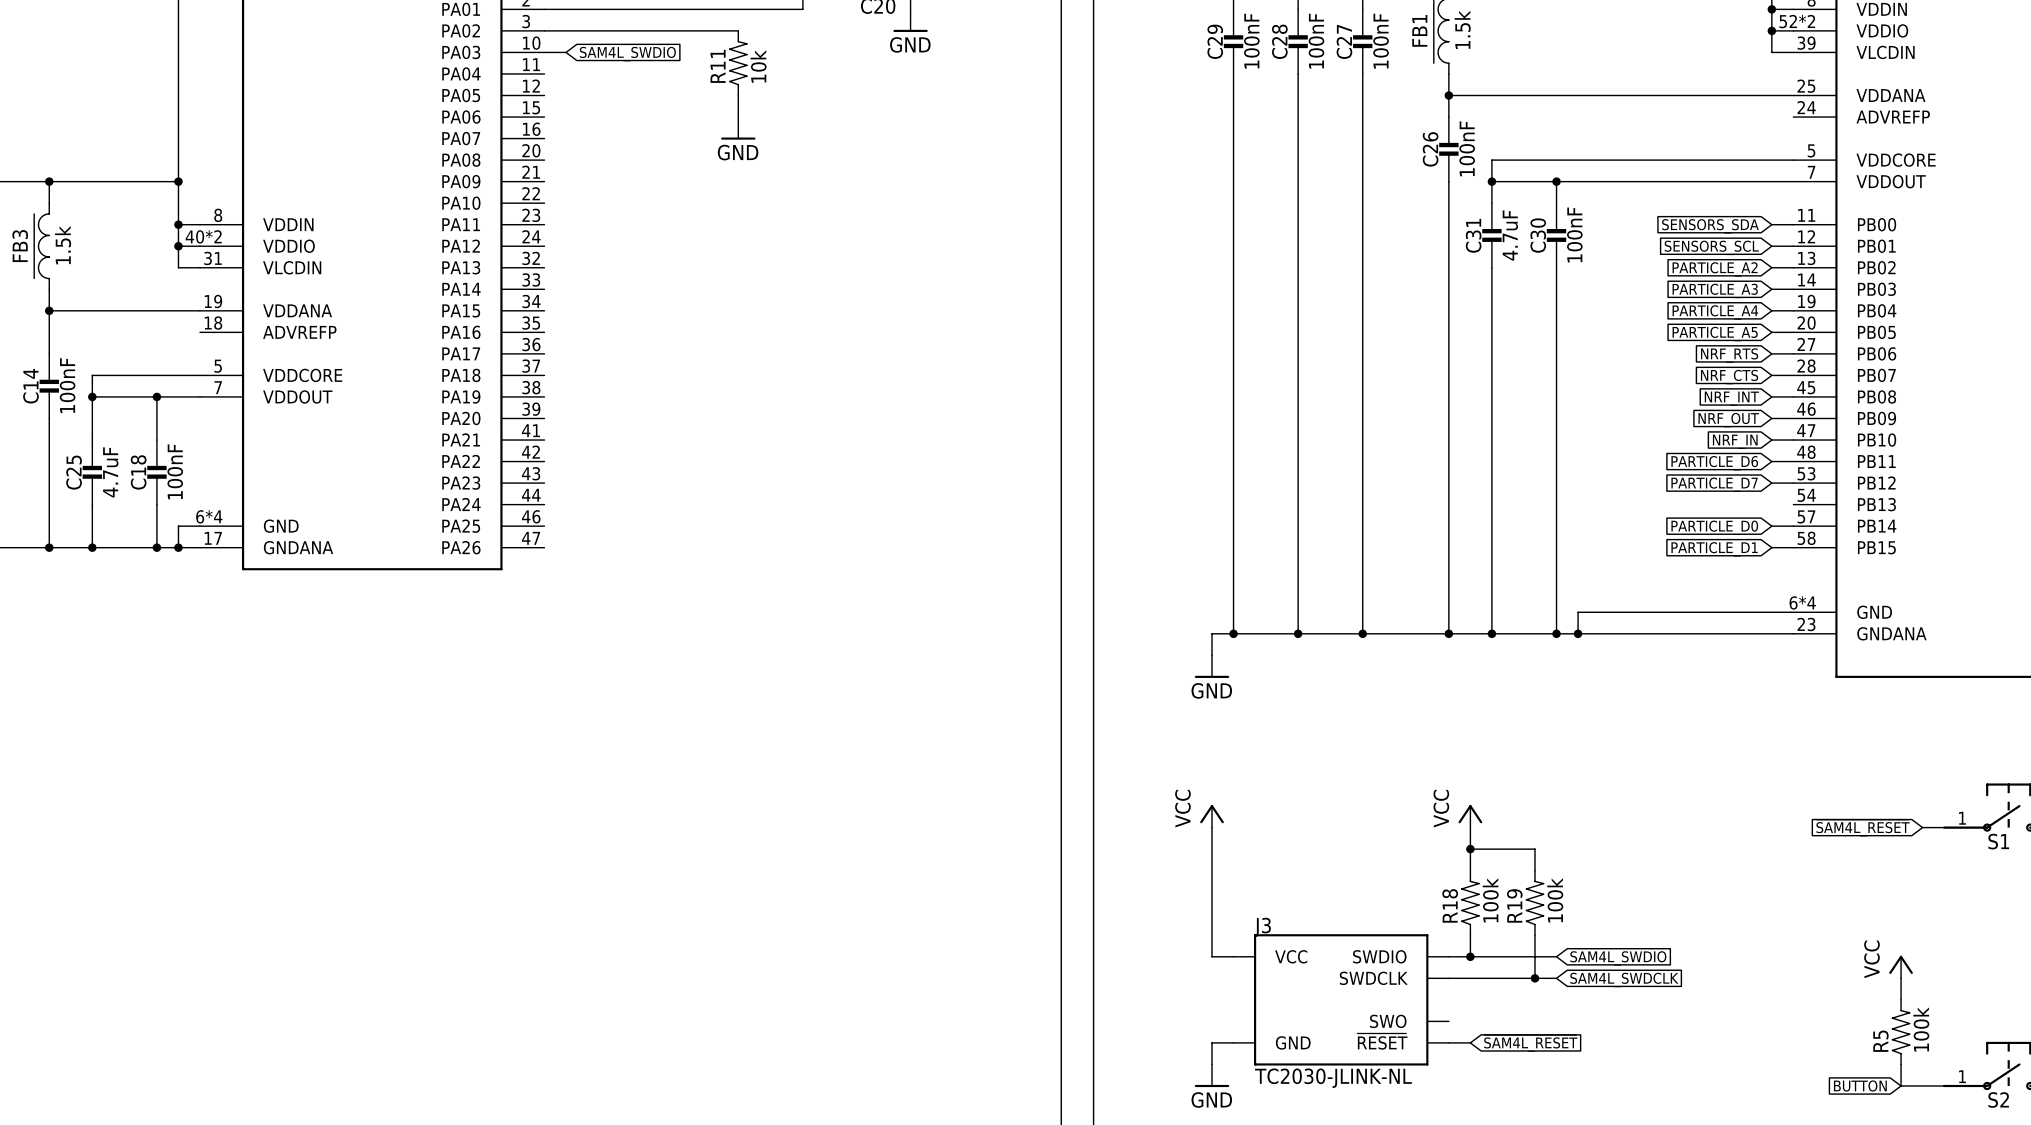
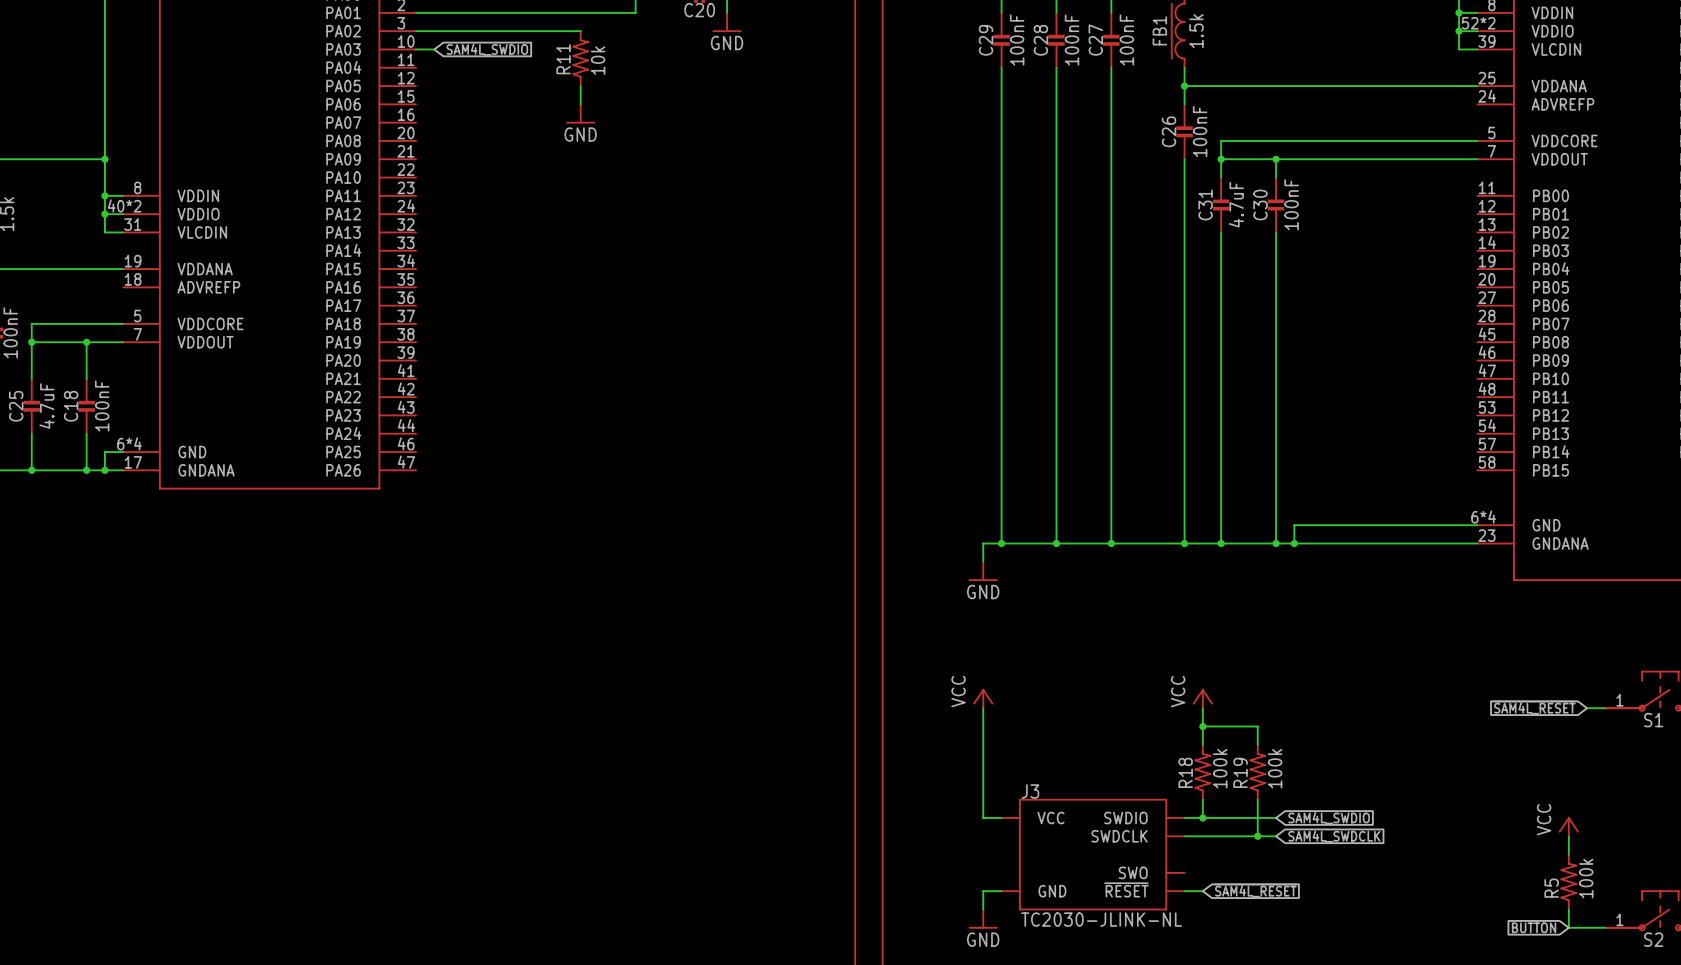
wire: (1771, 224) (1793, 224) -> none
global label: SENSORS_SDA (1710, 226) -> none
wire: (1771, 246) (1793, 246) -> none
global label: SENSORS_SCL (1711, 247) -> none
wire: (1771, 267) (1793, 267) -> none
global label: PARTICLE_A2 (1715, 269) -> none
wire: (1771, 289) (1793, 289) -> none
global label: PARTICLE_A3 (1715, 290) -> none
wire: (1771, 310) (1793, 310) -> none
global label: PARTICLE_A4 (1715, 312) -> none
wire: (1771, 332) (1793, 332) -> none
global label: PARTICLE_A5 (1715, 334) -> none
wire: (1771, 353) (1793, 353) -> none
global label: NRF_RTS (1729, 355) -> none
wire: (1771, 375) (1793, 375) -> none
global label: NRF_CTS (1729, 377) -> none
wire: (1771, 396) (1793, 396) -> none
global label: NRF_INT (1731, 398) -> none
wire: (1771, 418) (1793, 418) -> none
global label: NRF_OUT (1728, 420) -> none
wire: (1771, 440) (1793, 440) -> none
global label: NRF_IN (1735, 441) -> none
wire: (1771, 461) (1793, 461) -> none
global label: PARTICLE_D6 (1714, 463) -> none
wire: (1771, 483) (1793, 483) -> none
global label: PARTICLE_D7 (1714, 484) -> none
wire: (1771, 526) (1793, 526) -> none
global label: PARTICLE_D0 (1714, 527) -> none
wire: (1771, 547) (1793, 547) -> none
global label: PARTICLE_D1 (1714, 549) -> none

